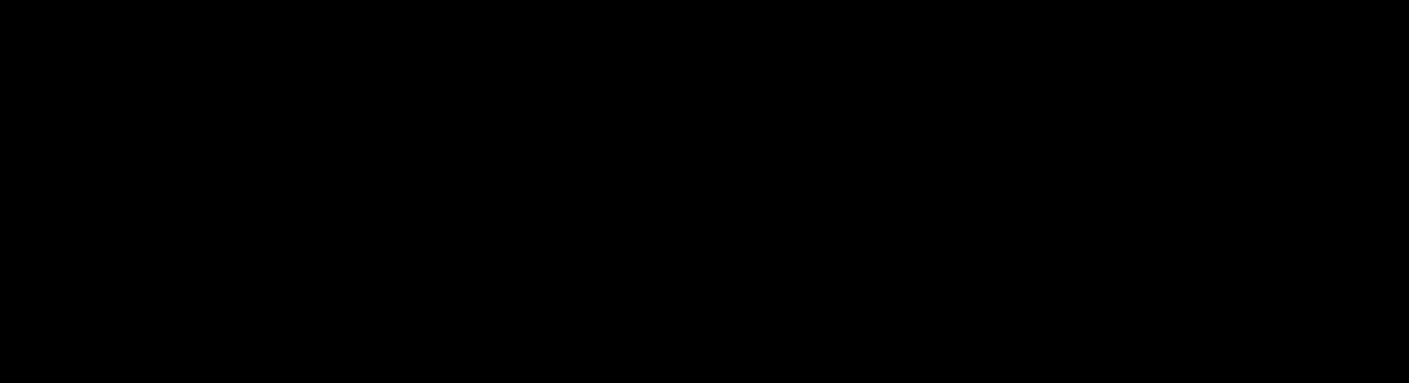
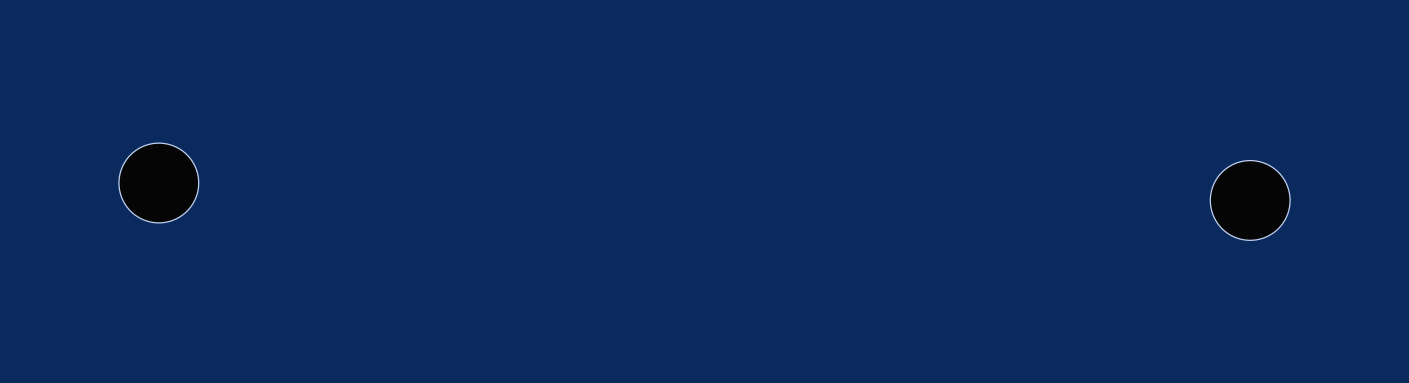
part: none -> (158, 183)
part: none -> (1250, 200)

